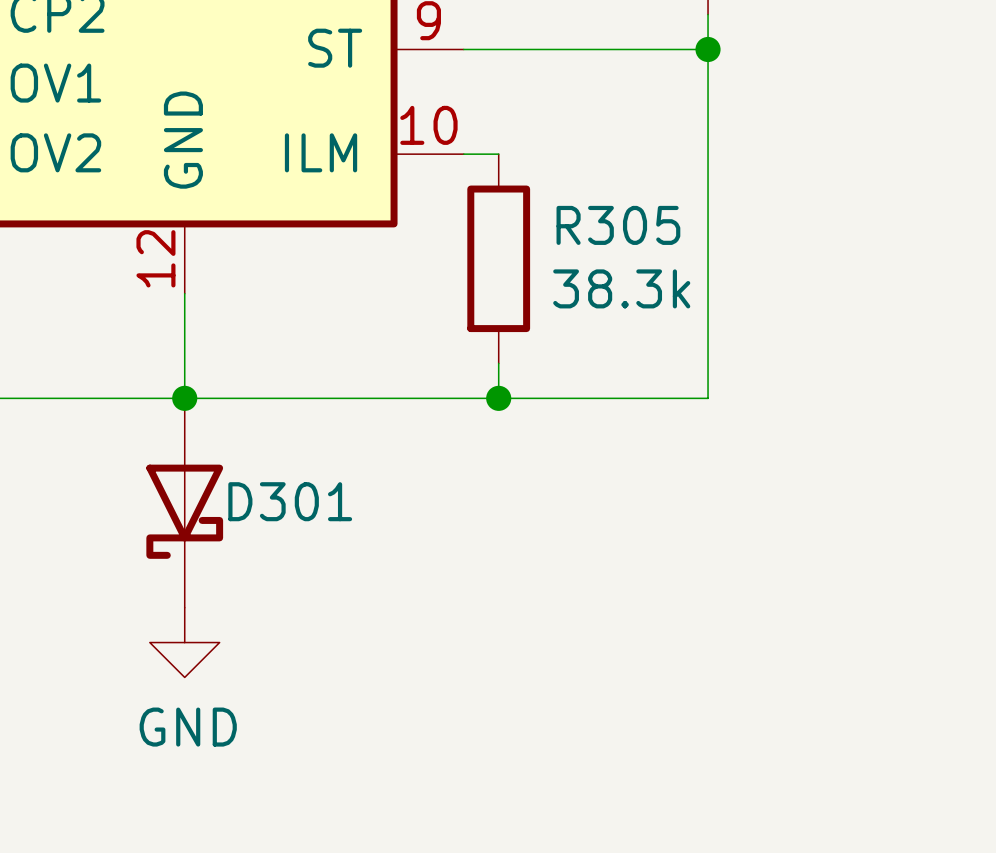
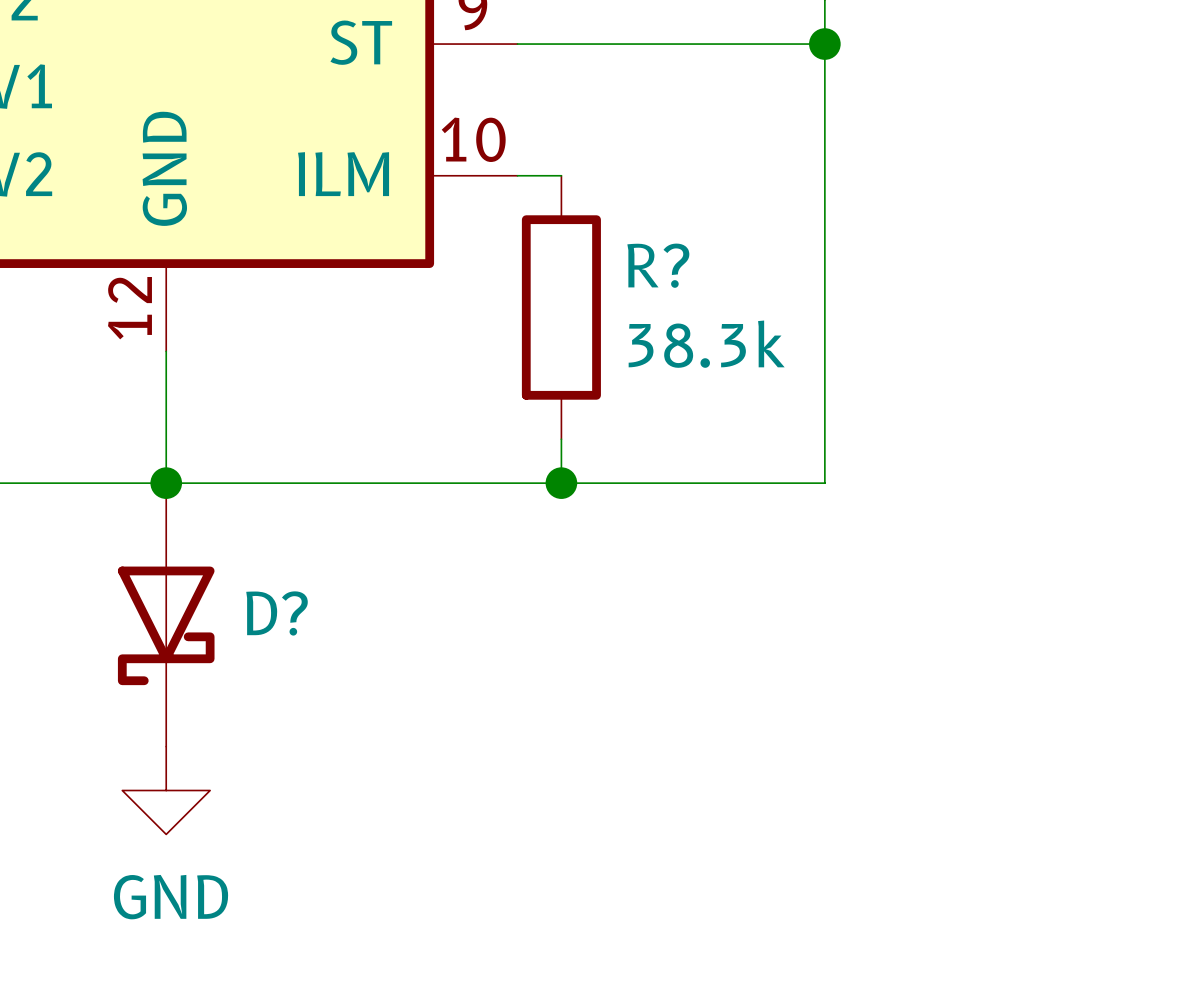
R305 name: R305 (618, 225) -> R? (658, 265)
D301 name: D301 (290, 501) -> D? (277, 613)

